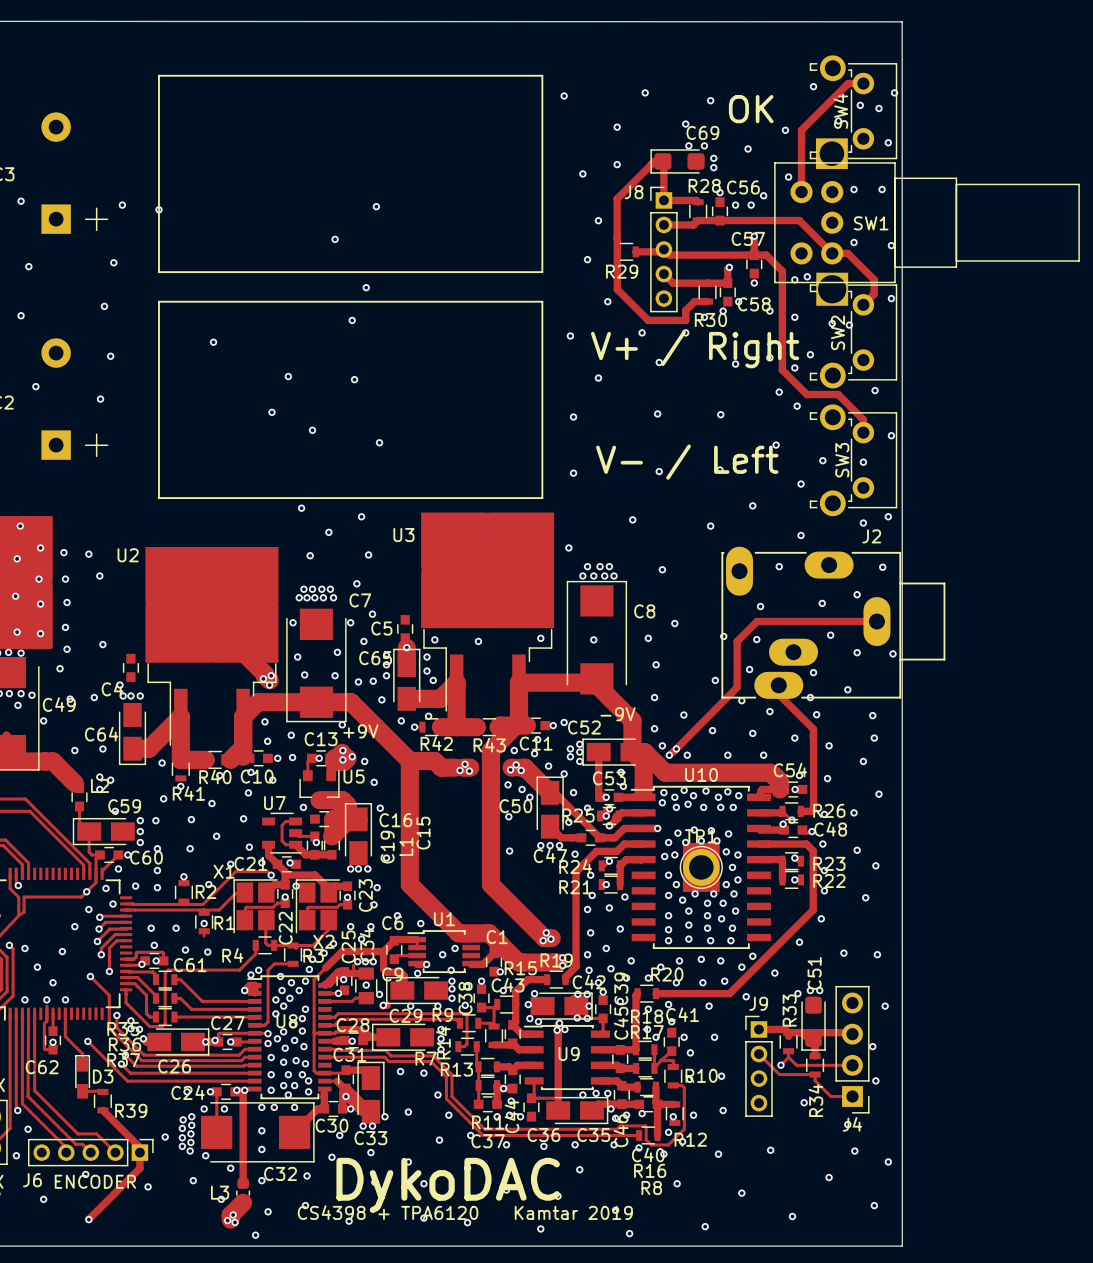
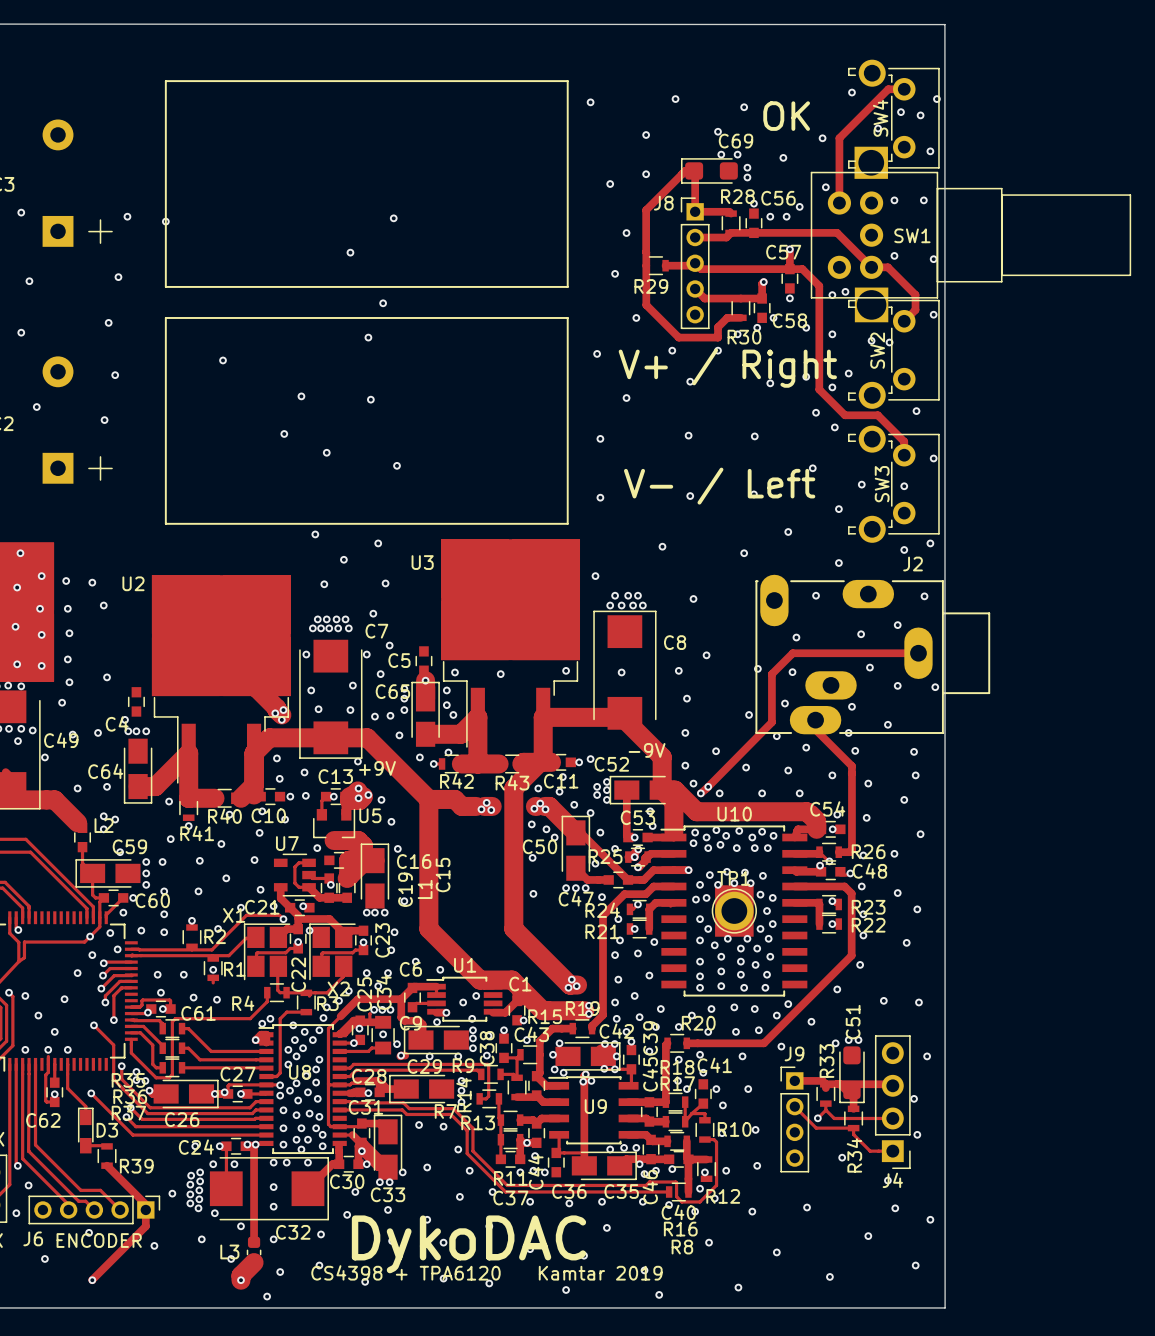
via: (233, 1214) -> none
via: none -> (240, 1280)
via: (227, 1220) -> none
via: (235, 1222) -> none

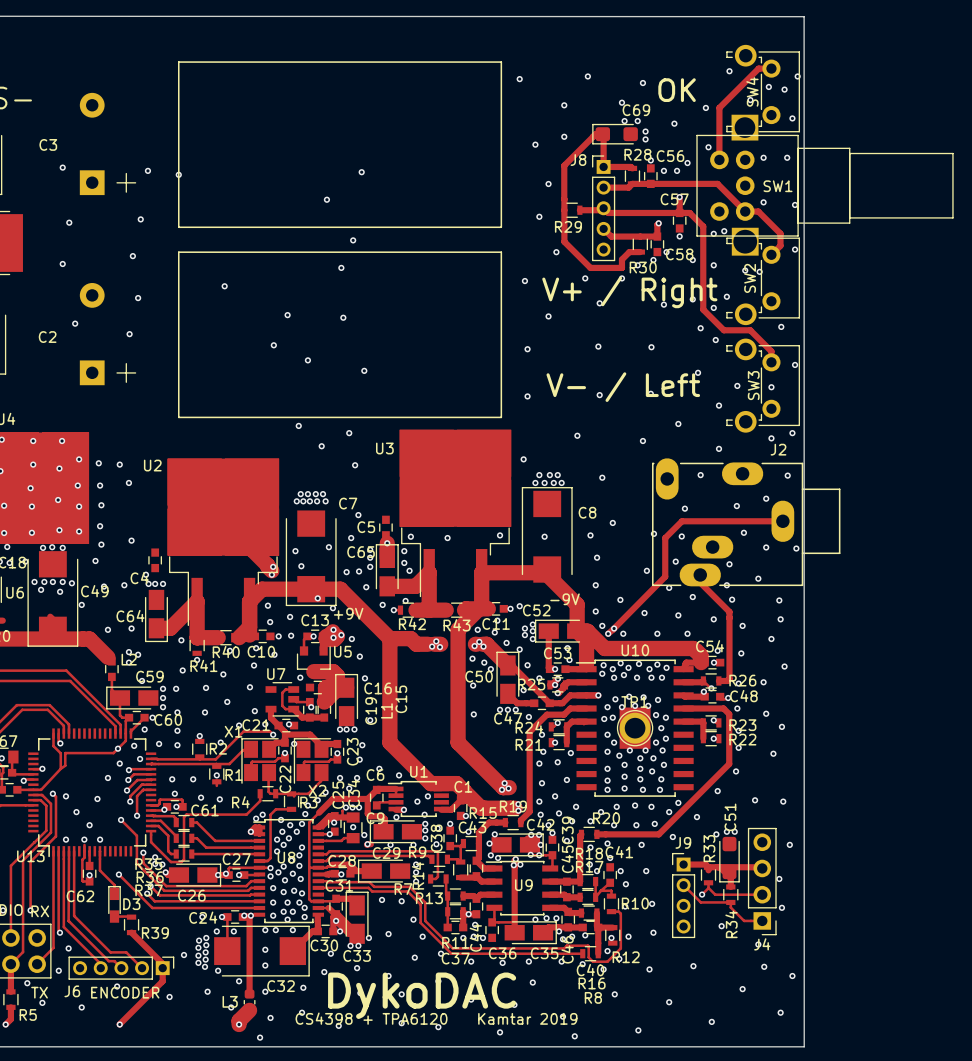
via: (324, 584) -> none
via: (373, 613) -> none
via: (306, 654) -> none
via: (366, 654) -> none
via: (350, 710) -> none
via: (275, 713) -> none
via: none -> (317, 598)

